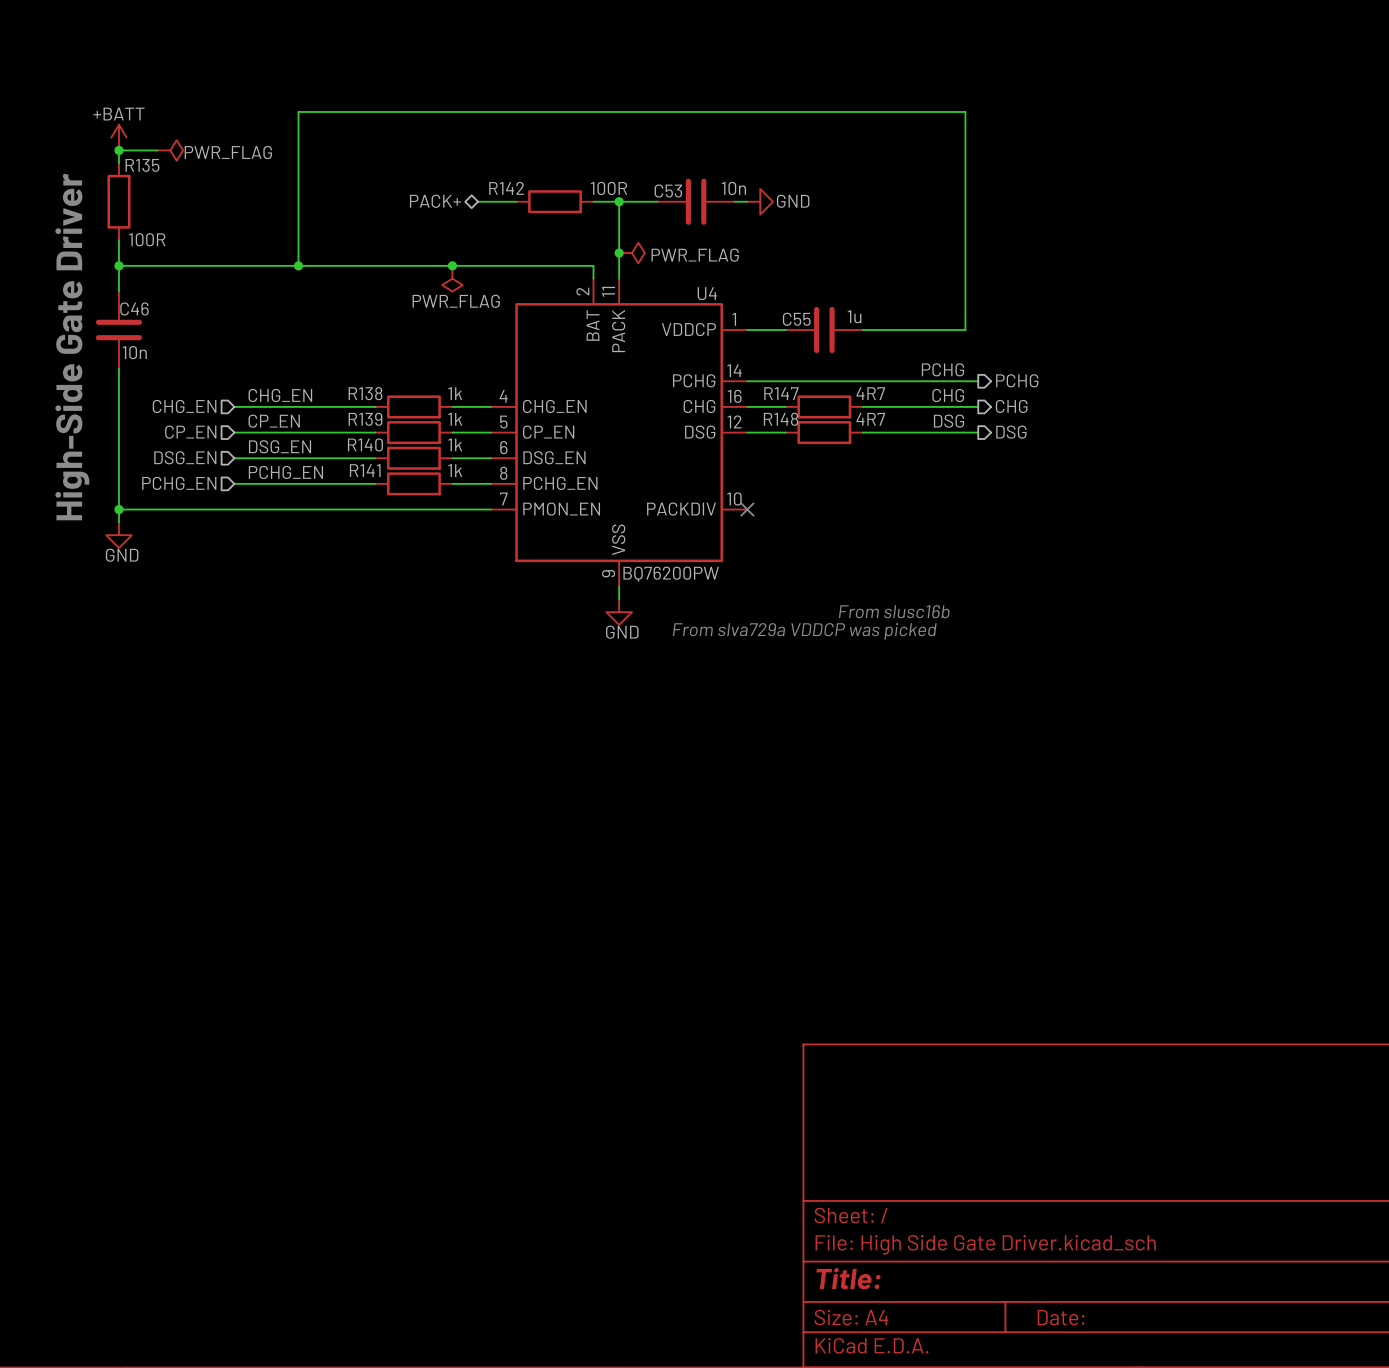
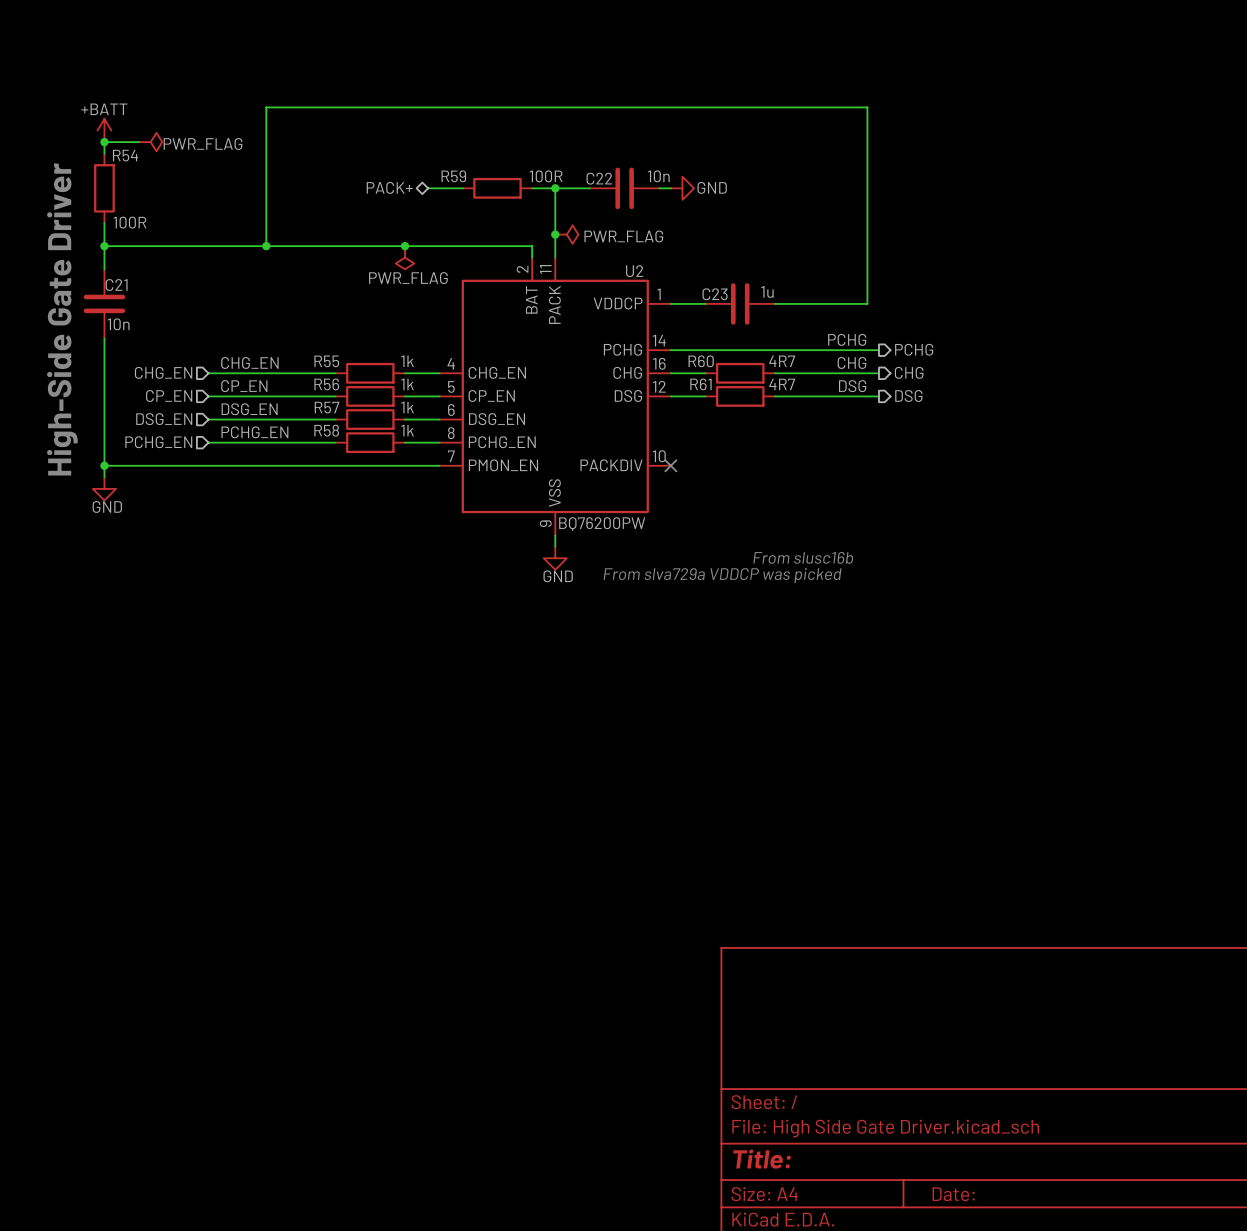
R135 name: R135 (142, 165) -> R54 (125, 155)
R142 name: R142 (506, 188) -> R59 (453, 176)
C53 name: C53 (668, 191) -> C22 (599, 178)
U4 name: U4 (707, 293) -> U2 (634, 271)
C46 name: C46 (134, 309) -> C21 (116, 285)
C55 name: C55 (796, 319) -> C23 (715, 294)
R138 name: R138 (365, 393) -> R55 (326, 361)
R147 name: R147 (781, 393) -> R60 (701, 361)
R139 name: R139 (365, 419) -> R56 (326, 384)
R148 name: R148 (781, 419) -> R61 (700, 384)
R140 name: R140 (365, 444) -> R57 (327, 407)
R141 name: R141 (365, 470) -> R58 (326, 430)

